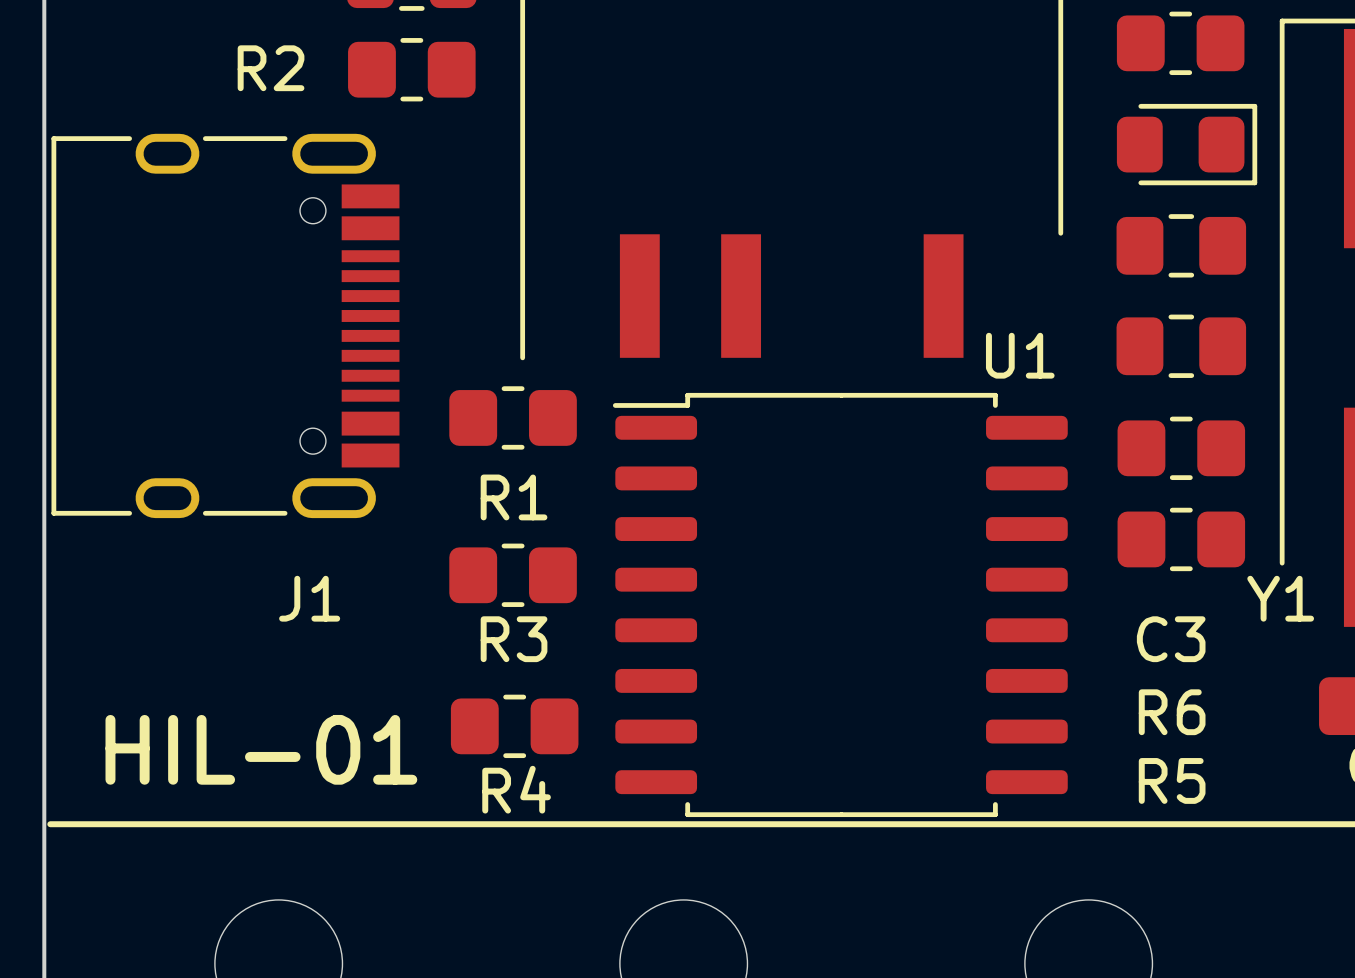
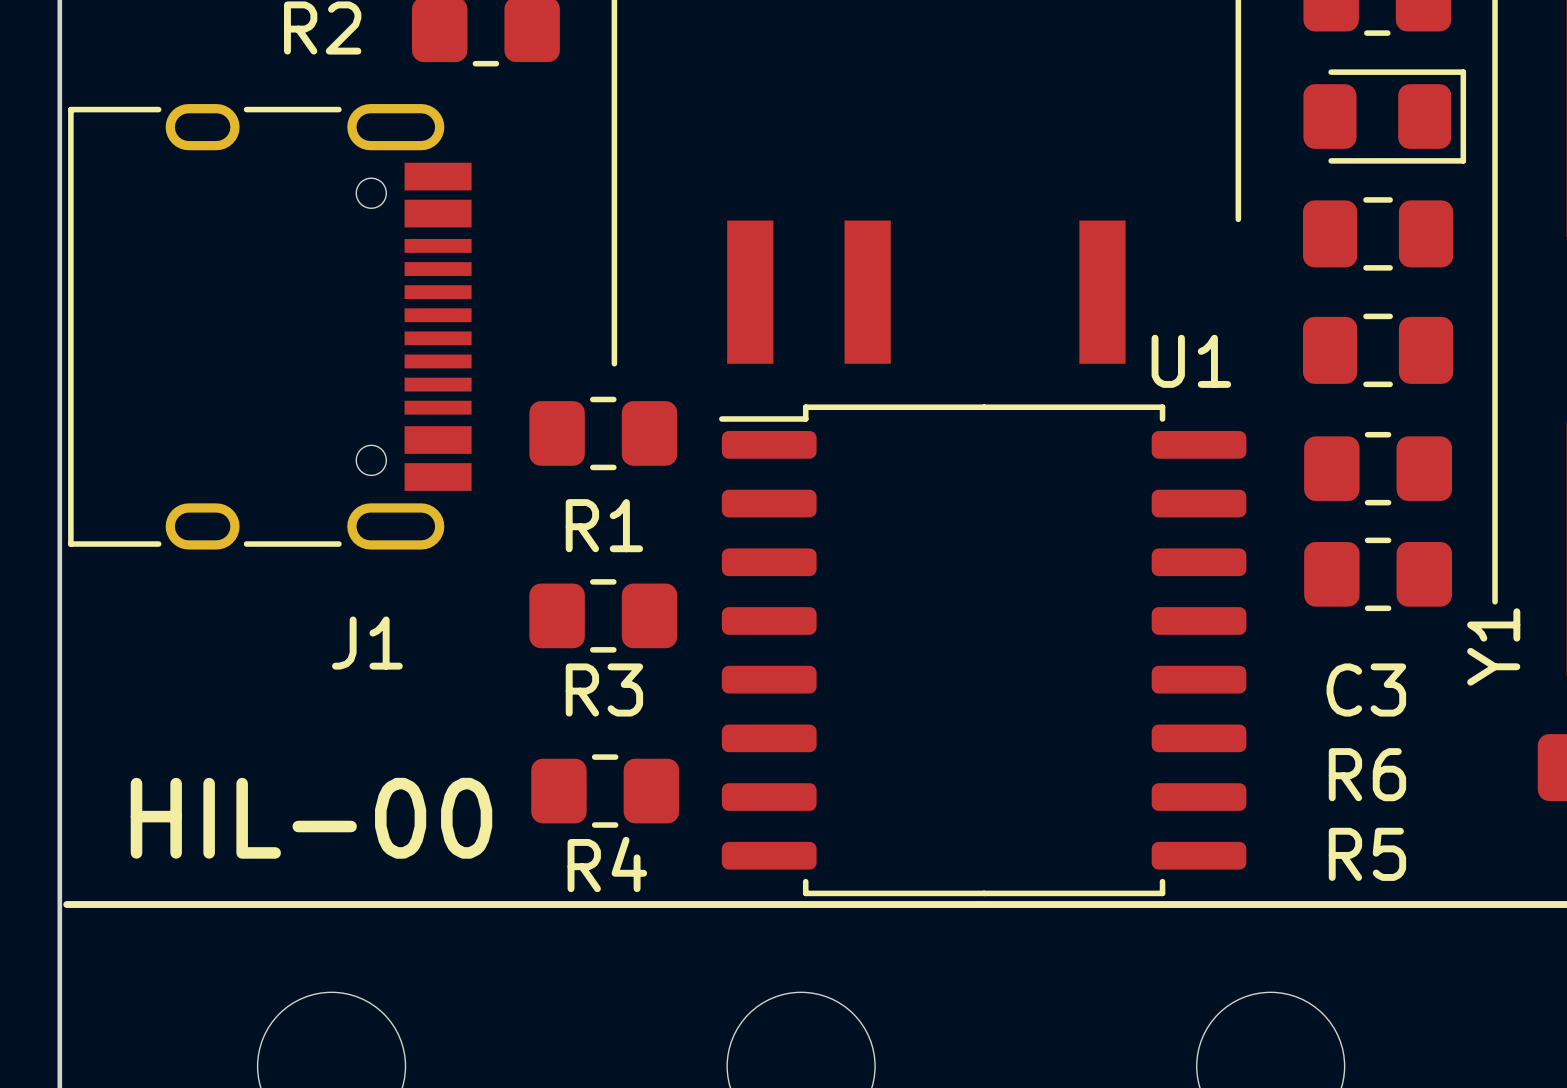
Y1 name rotation: 0° (1280, 598) -> 90° counterclockwise (1493, 646)
text: HIL-01 (261, 749) -> HIL-00 (311, 818)

